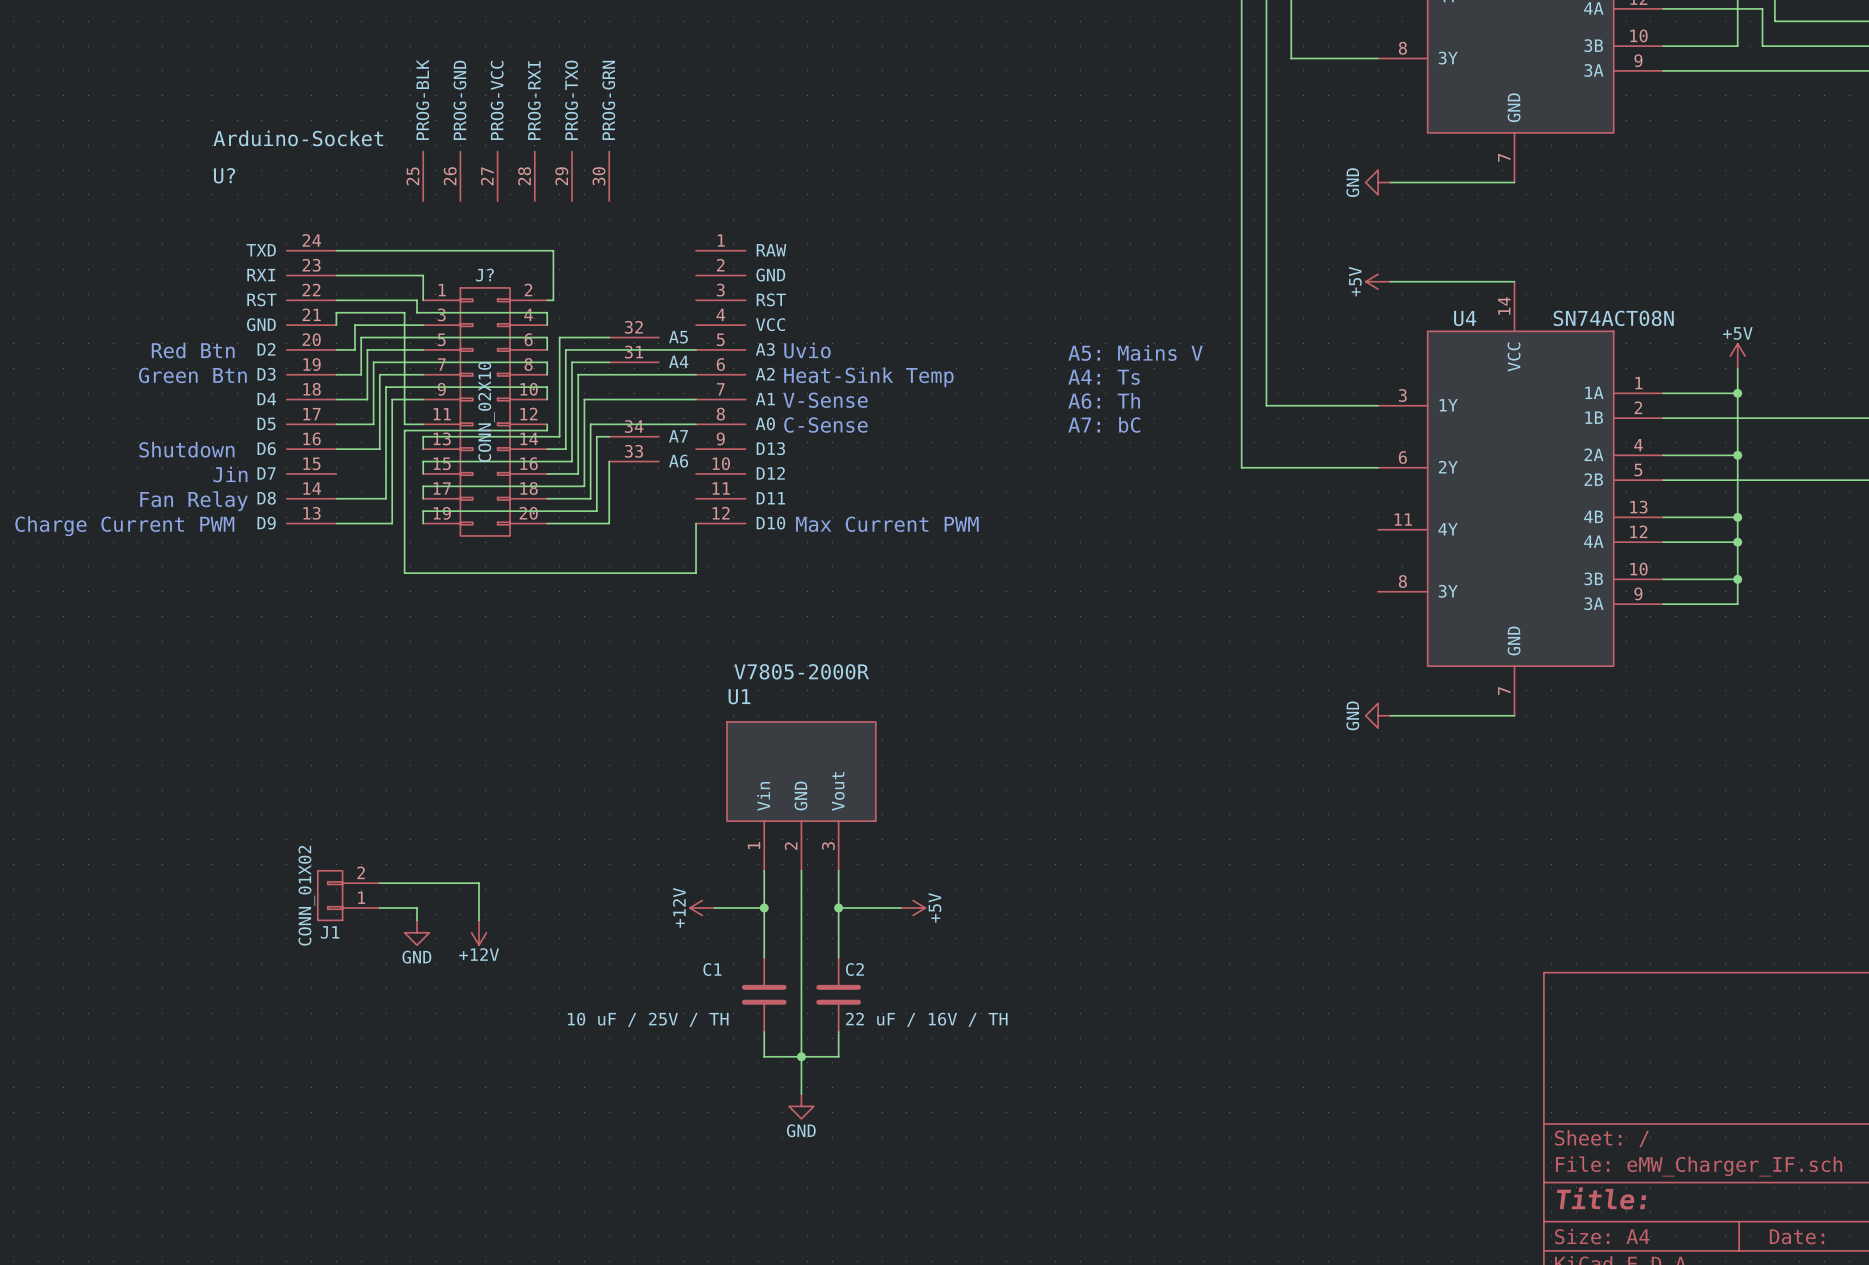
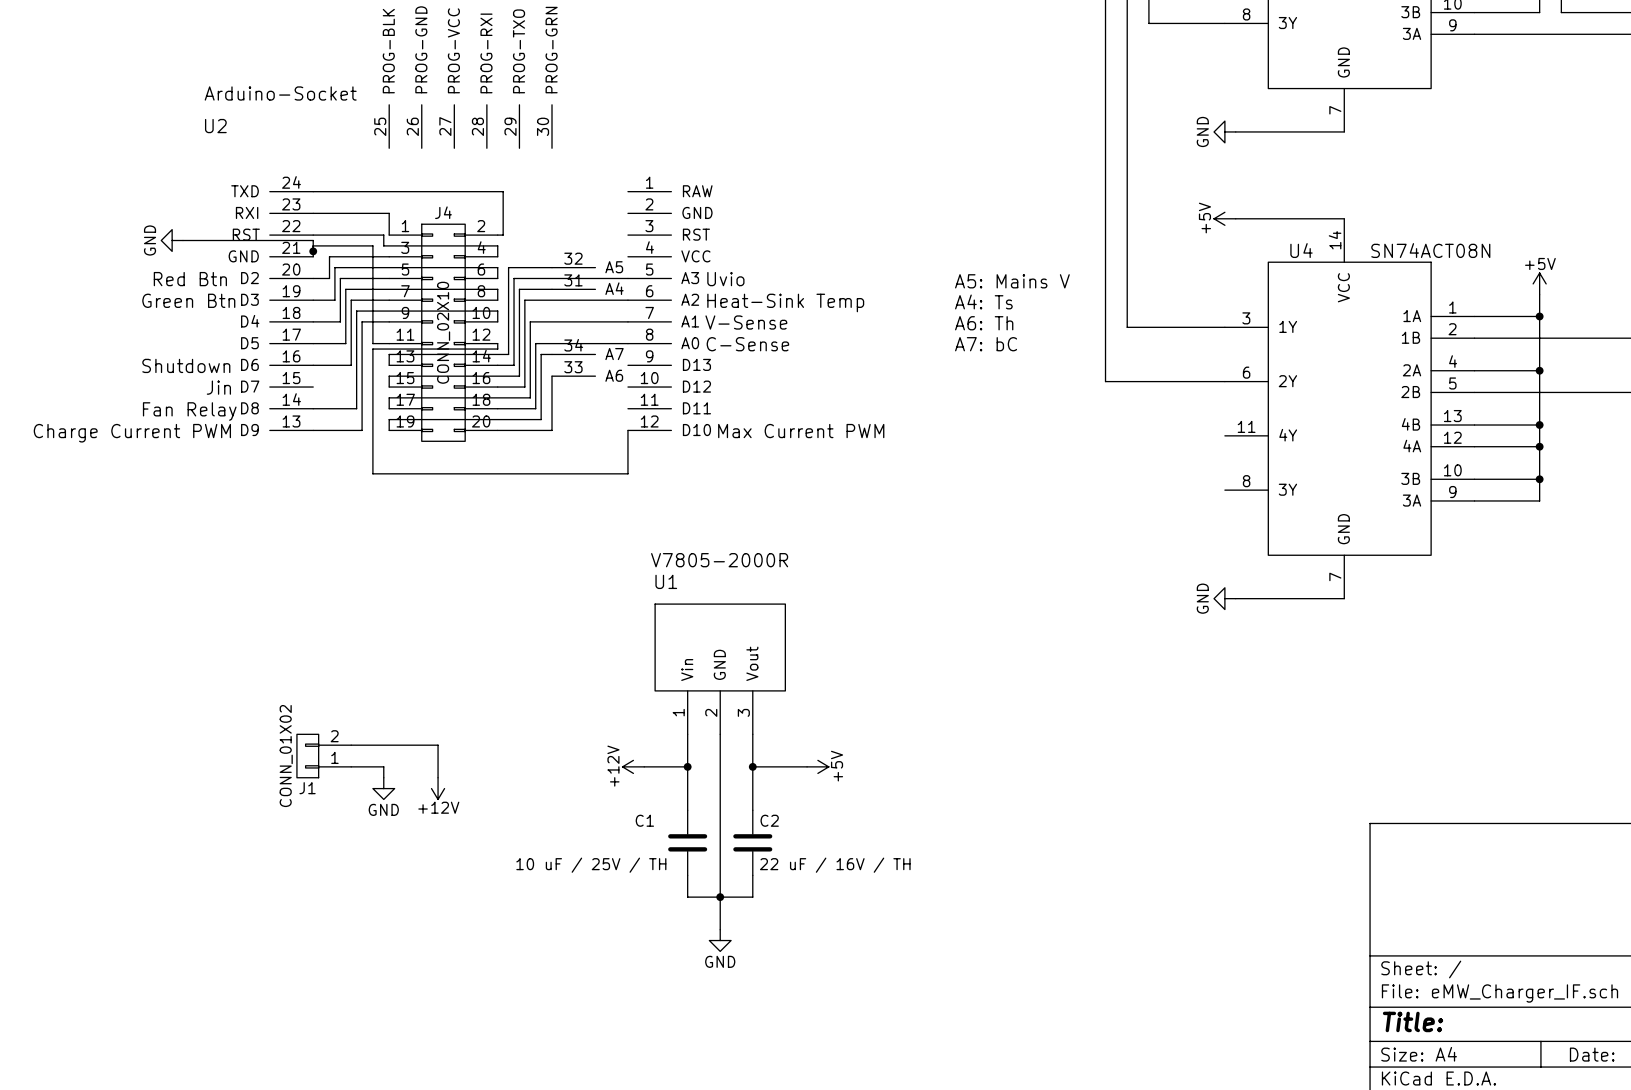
U? name: U? (224, 175) -> U2 (215, 126)
J? name: J? (484, 275) -> J4 (443, 212)
power symbol: none -> GND (172, 240)
wire: none -> (182, 240) (313, 240) (313, 245)
junction: none -> (313, 251)

